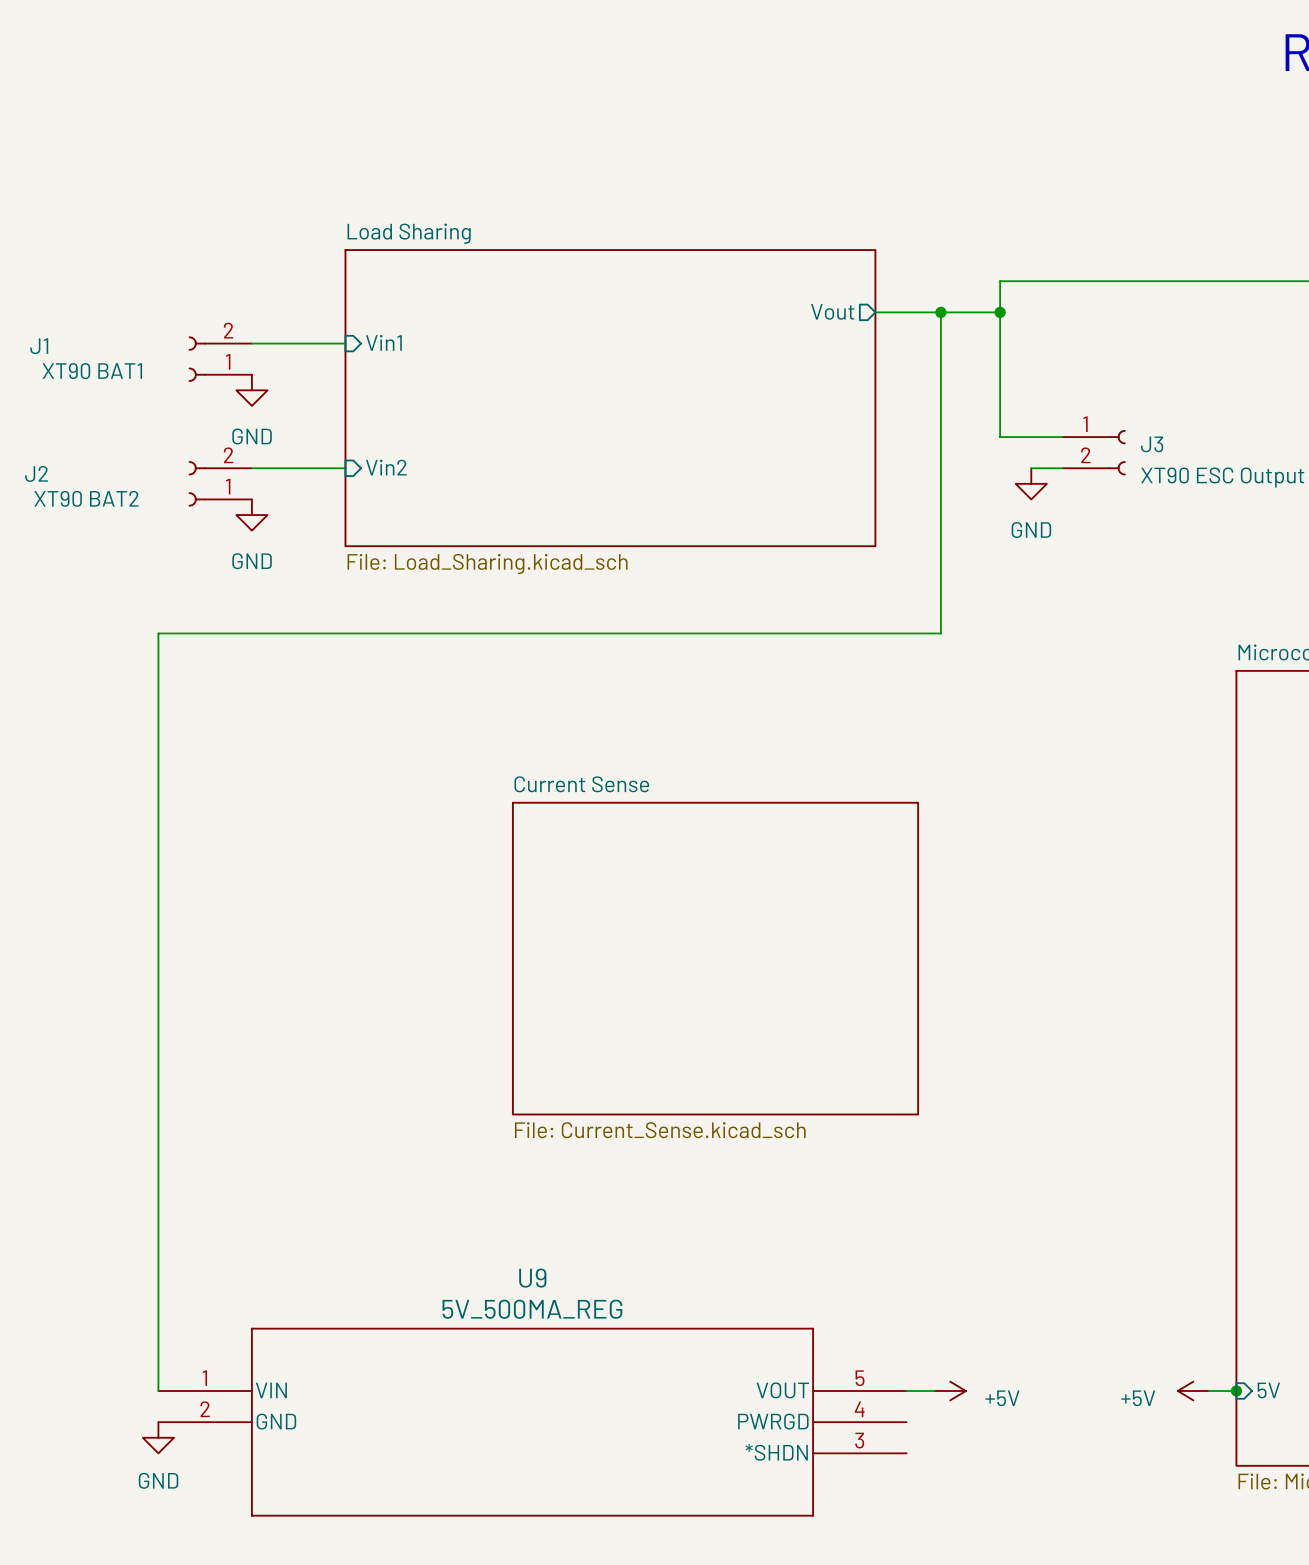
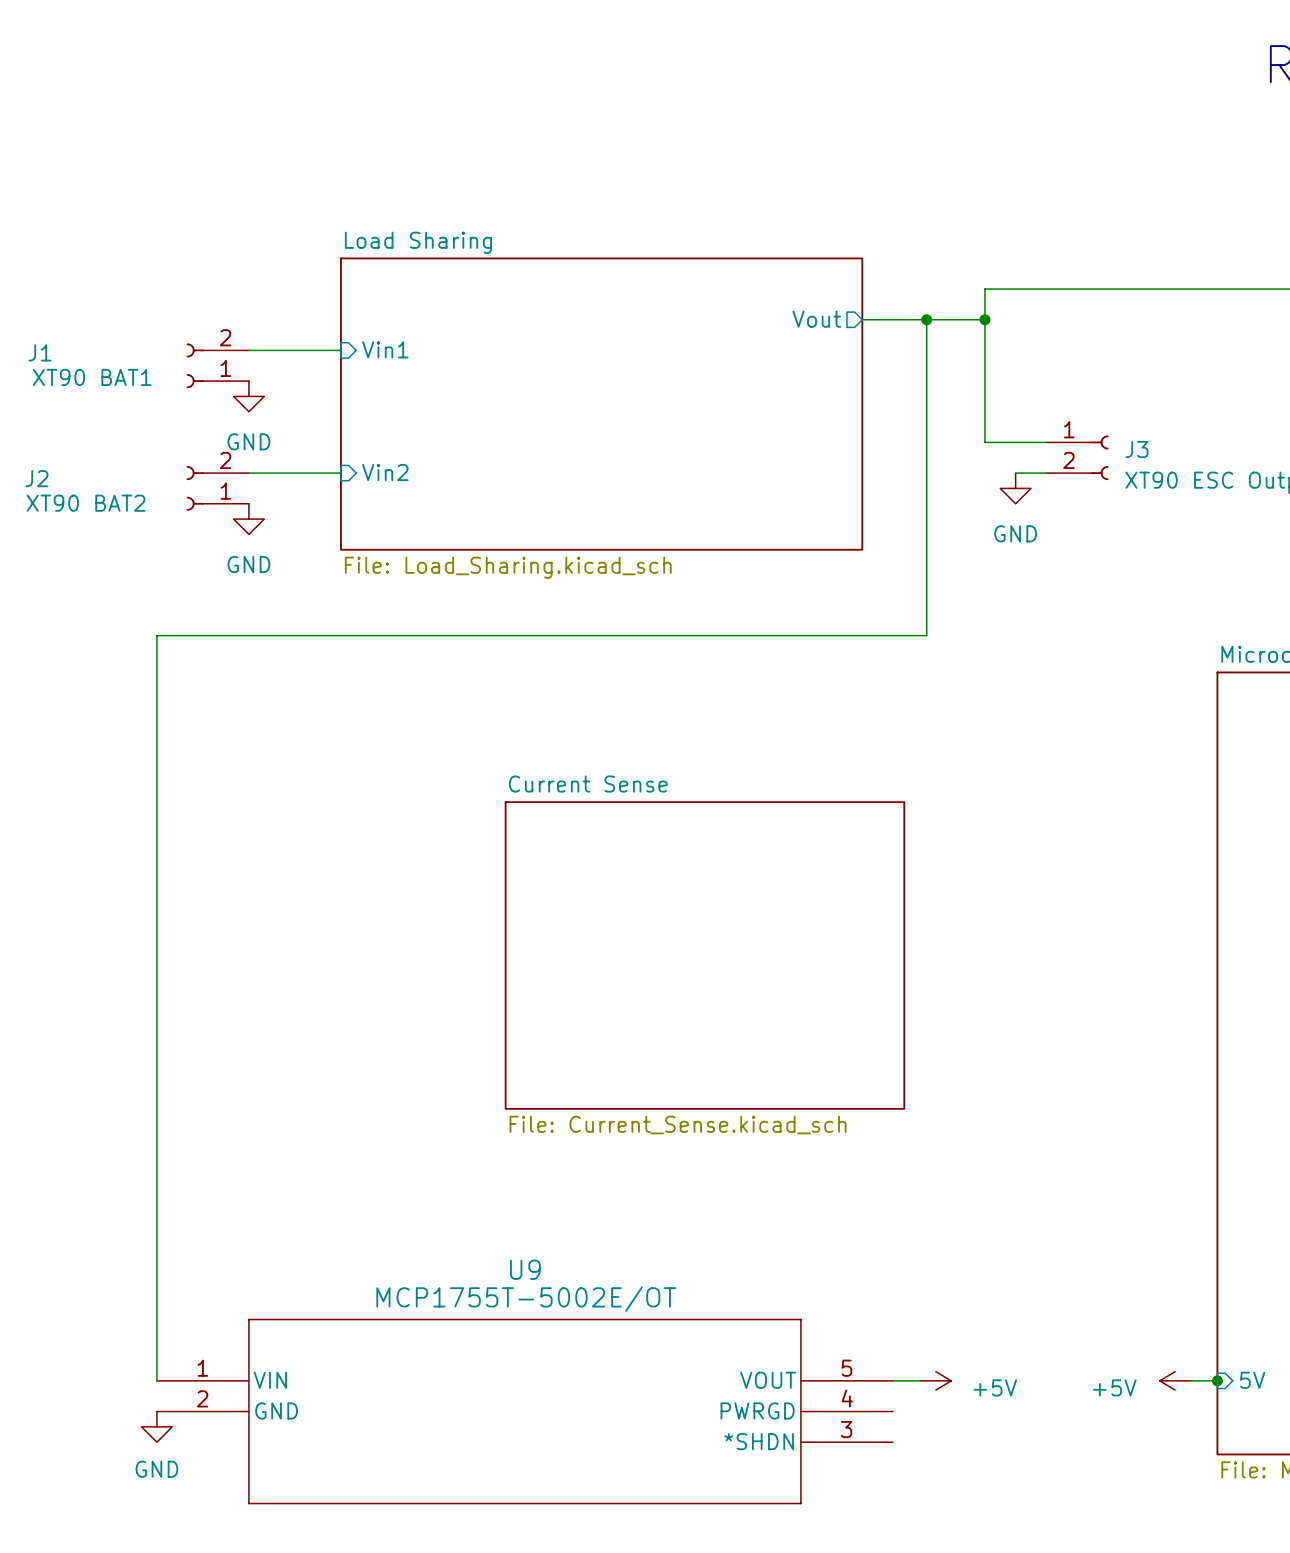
U9 value: 5V_500MA_REG (532, 1309) -> MCP1755T-5002E/OT (526, 1299)

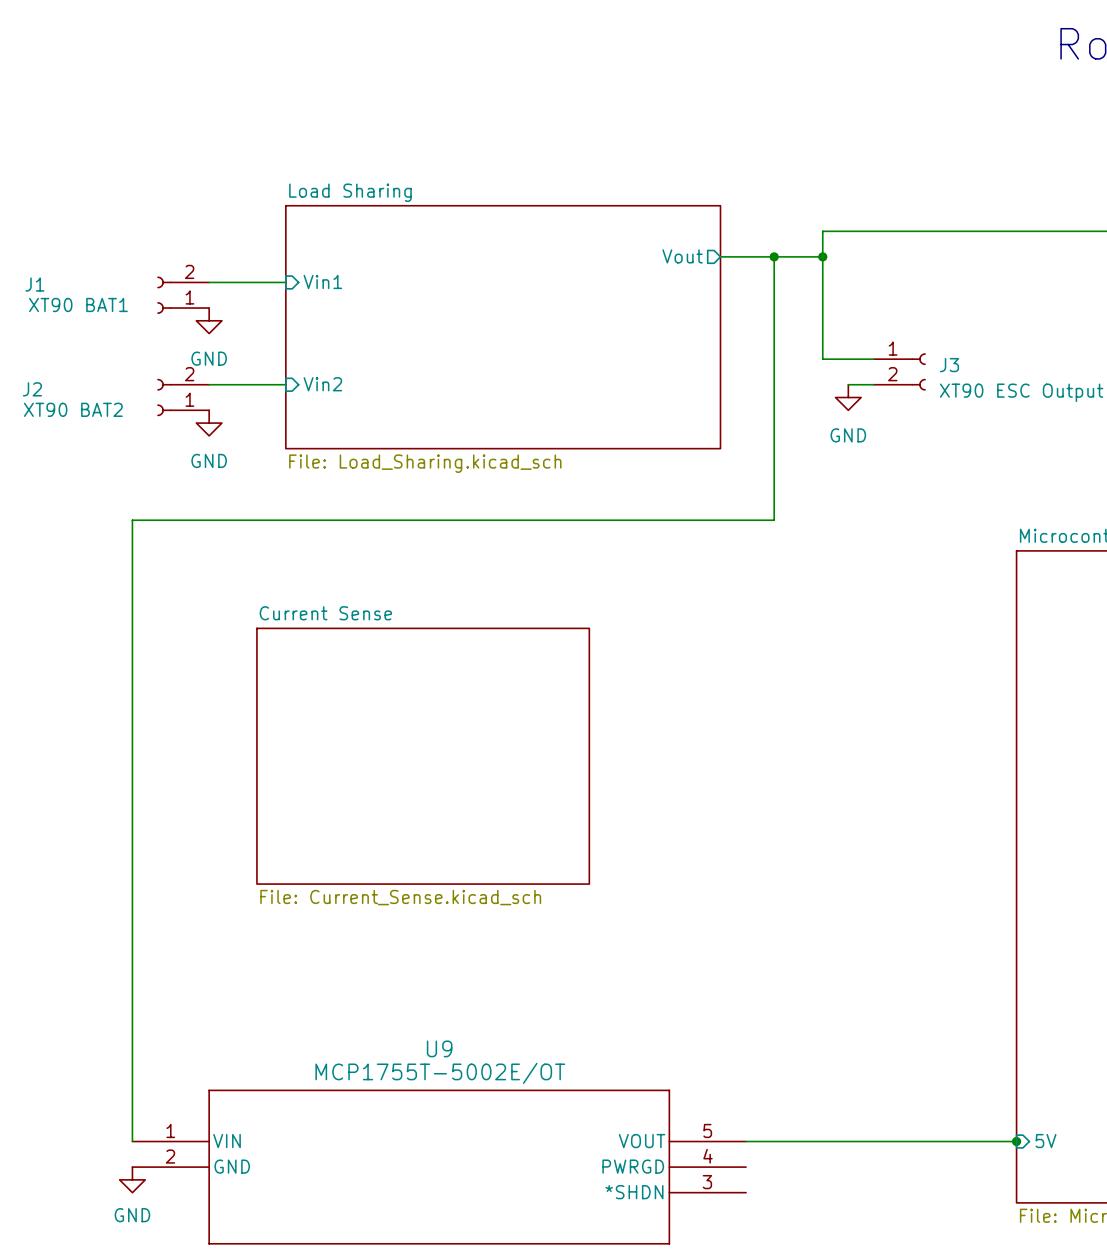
sheet Current Sense position: (704, 955) -> (423, 756)
wire: none -> (769, 1141) (994, 1141)
power symbol: +5V (935, 1380) -> none
power symbol: +5V (1175, 1380) -> none

